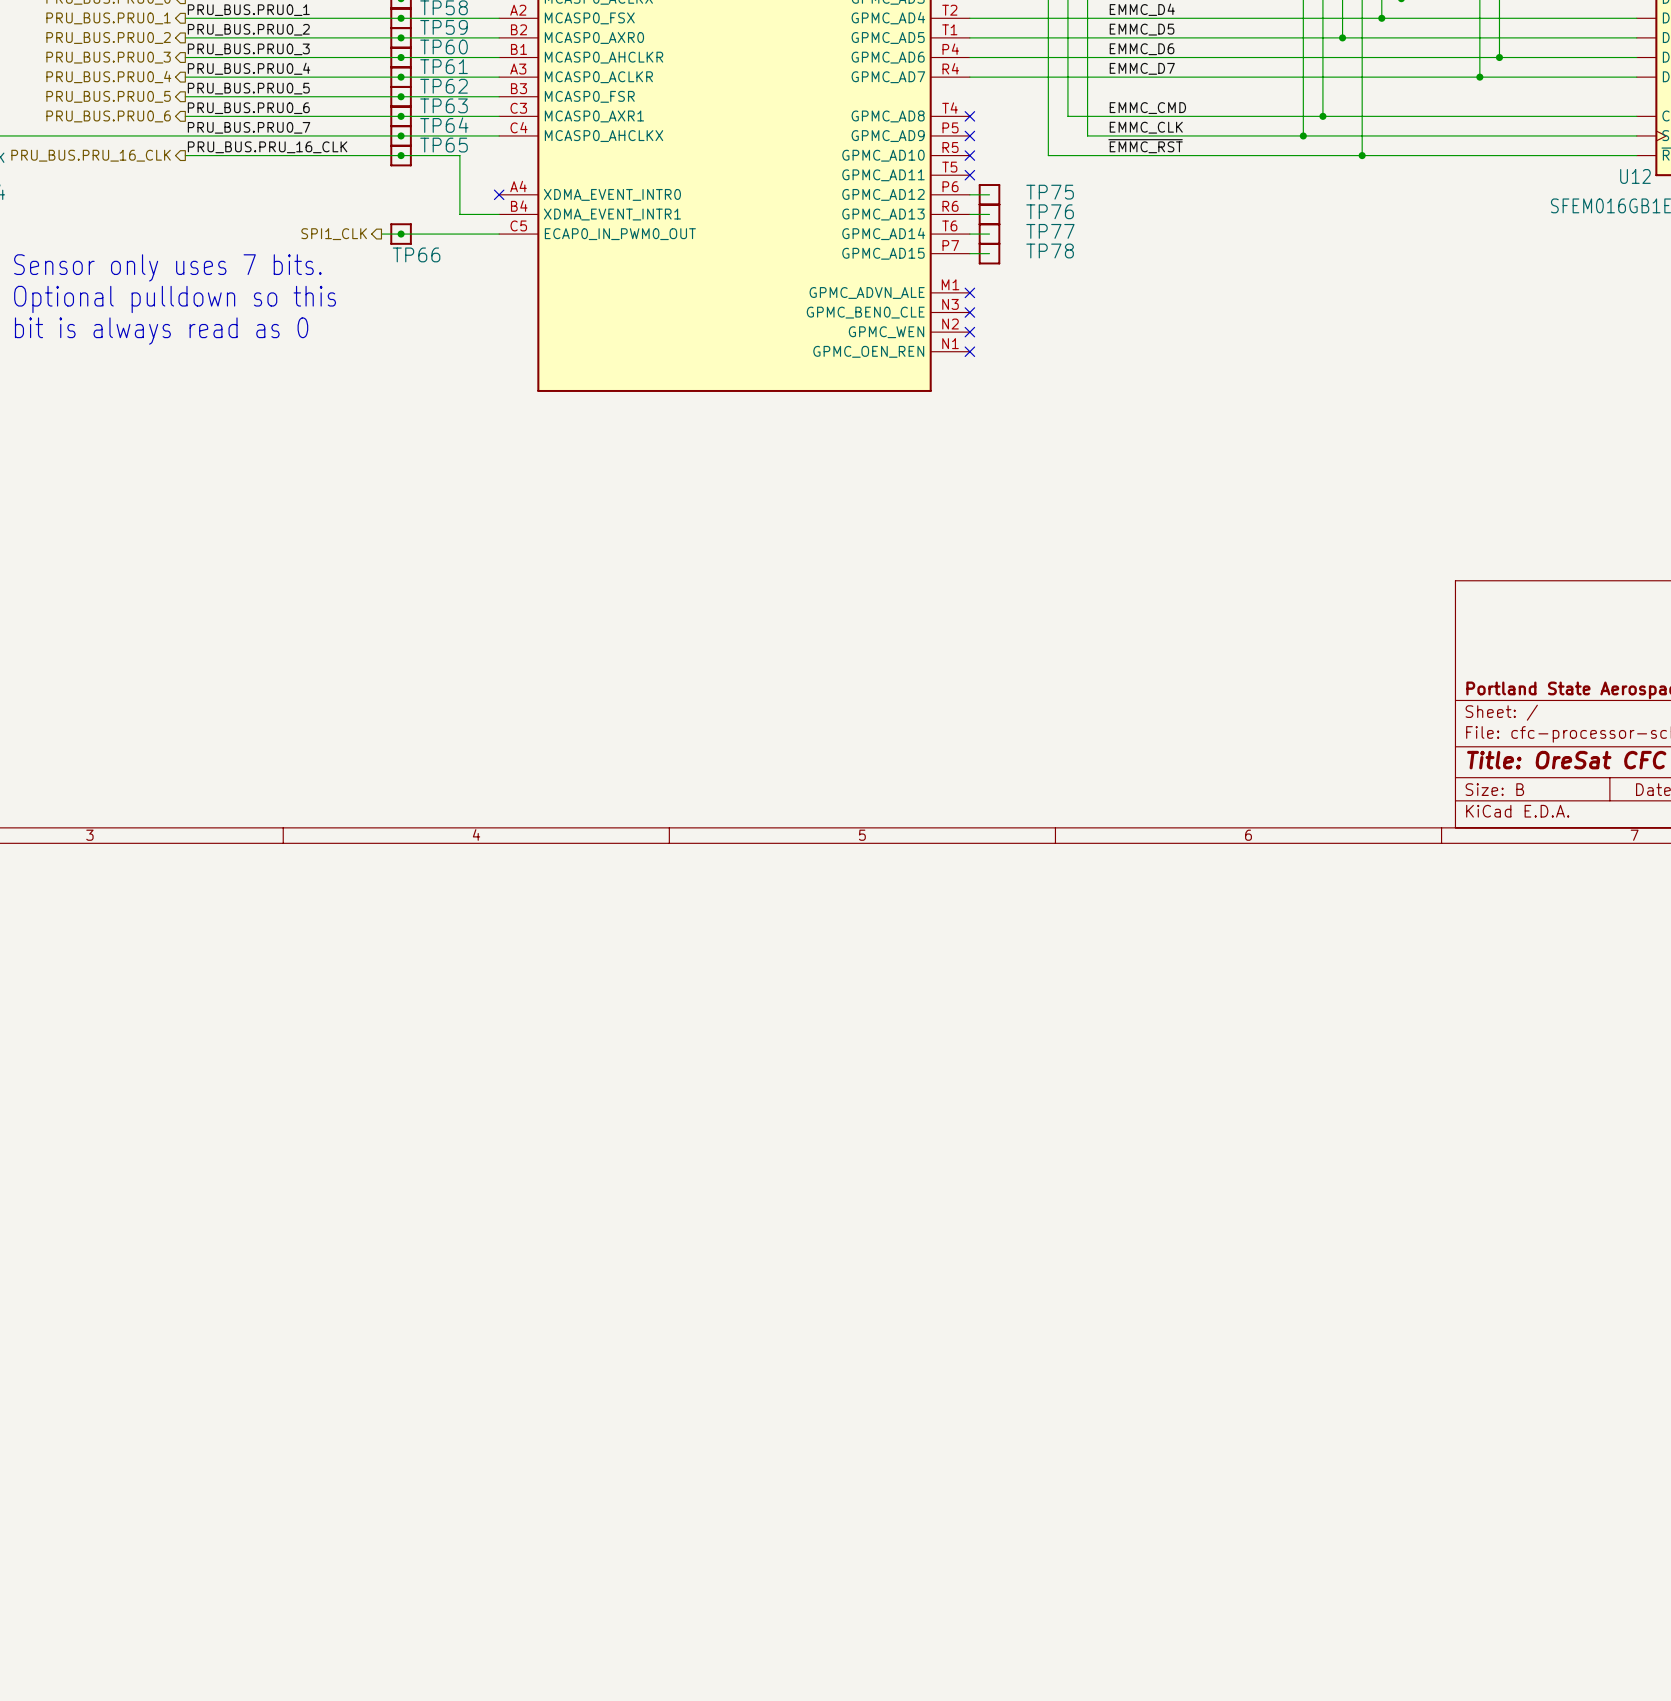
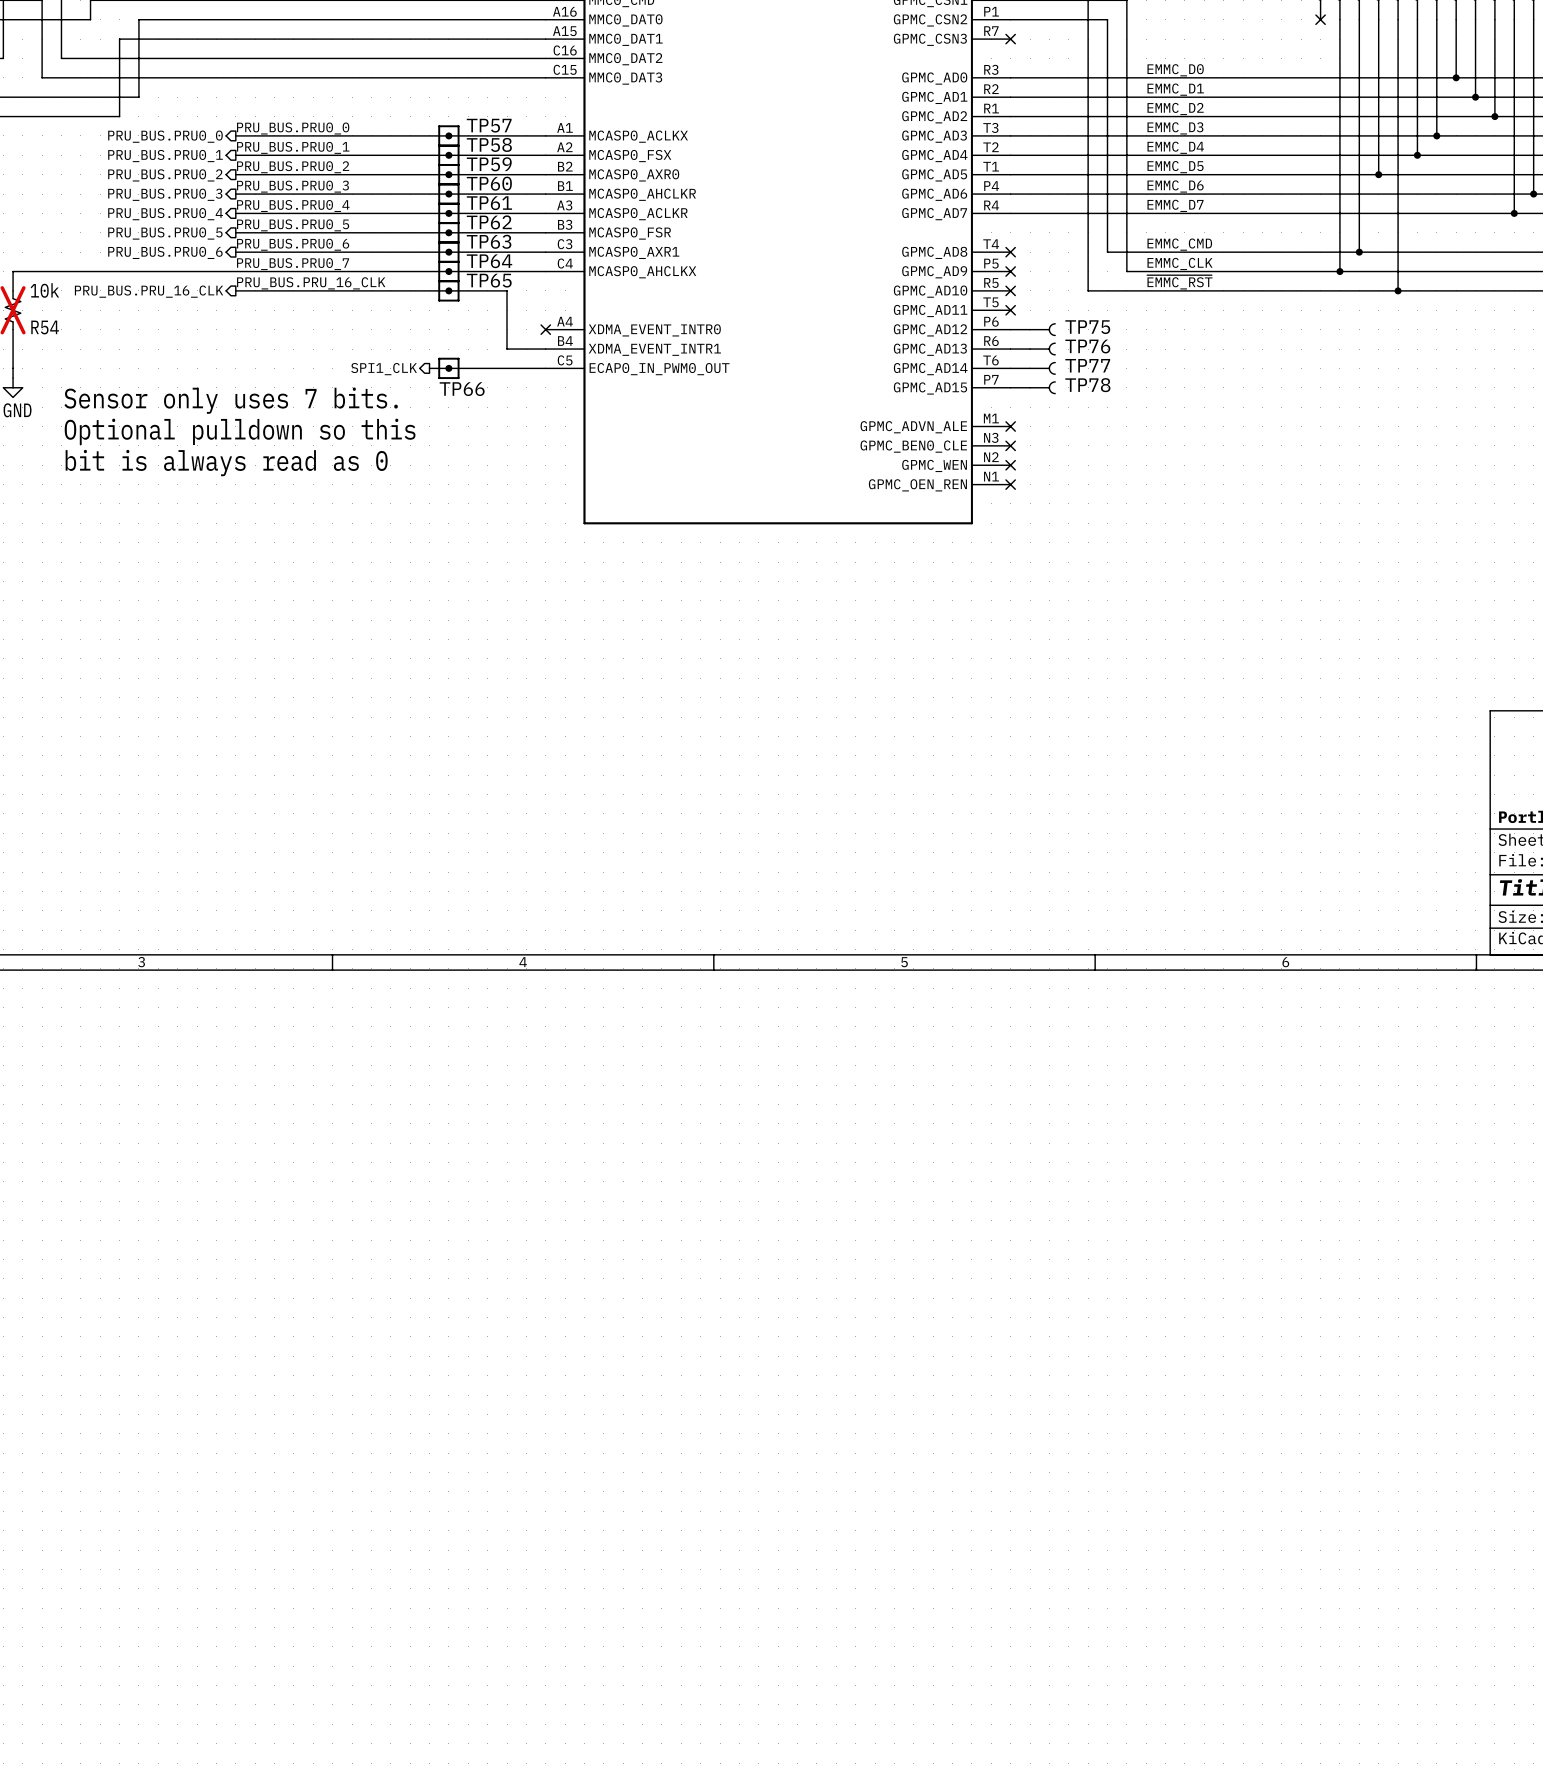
TP75 symbol: [978, 184, 1001, 206] -> [1029, 323, 1056, 337]
TP76 symbol: [978, 203, 1001, 226] -> [1029, 342, 1056, 356]
TP77 symbol: [978, 223, 1001, 245] -> [1029, 361, 1056, 375]
TP78 symbol: [978, 242, 1001, 265] -> [1029, 381, 1056, 395]

